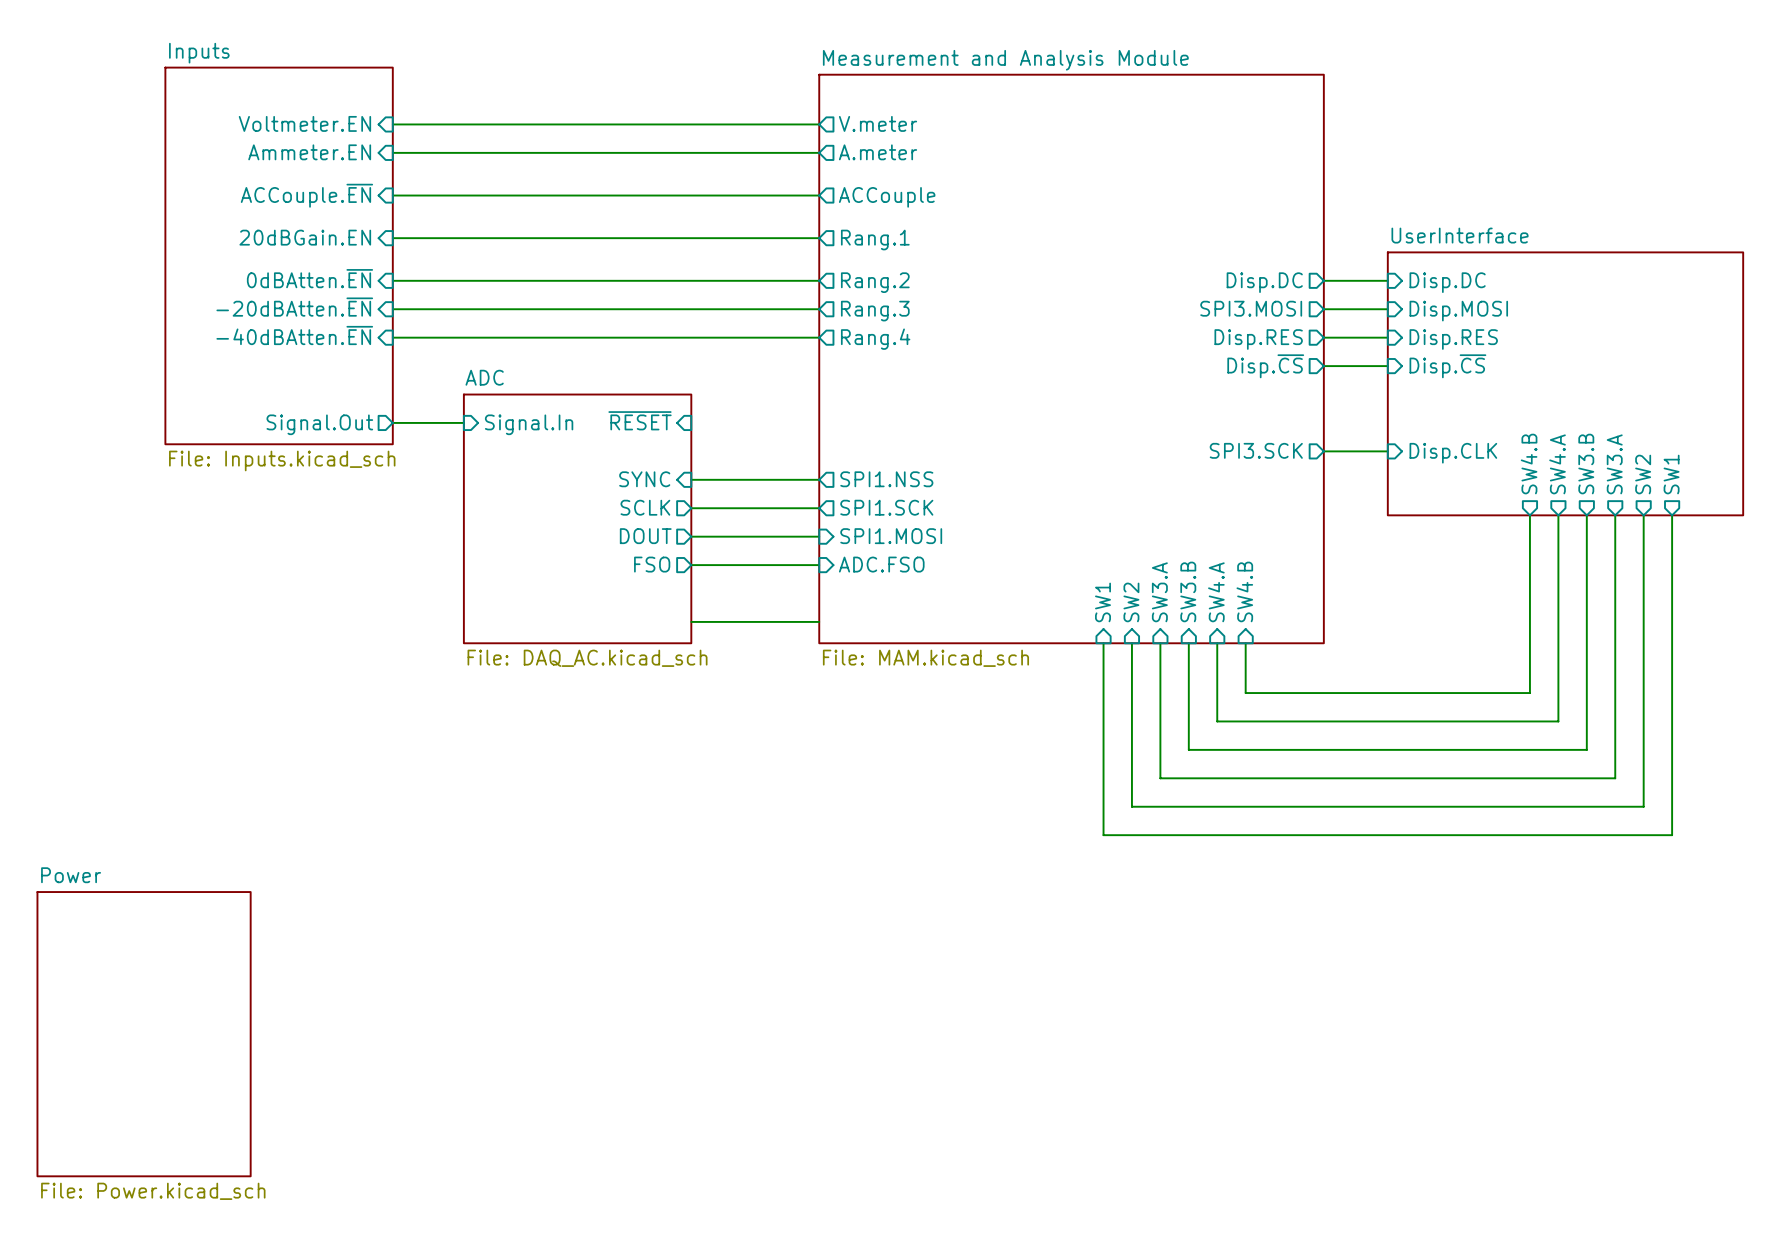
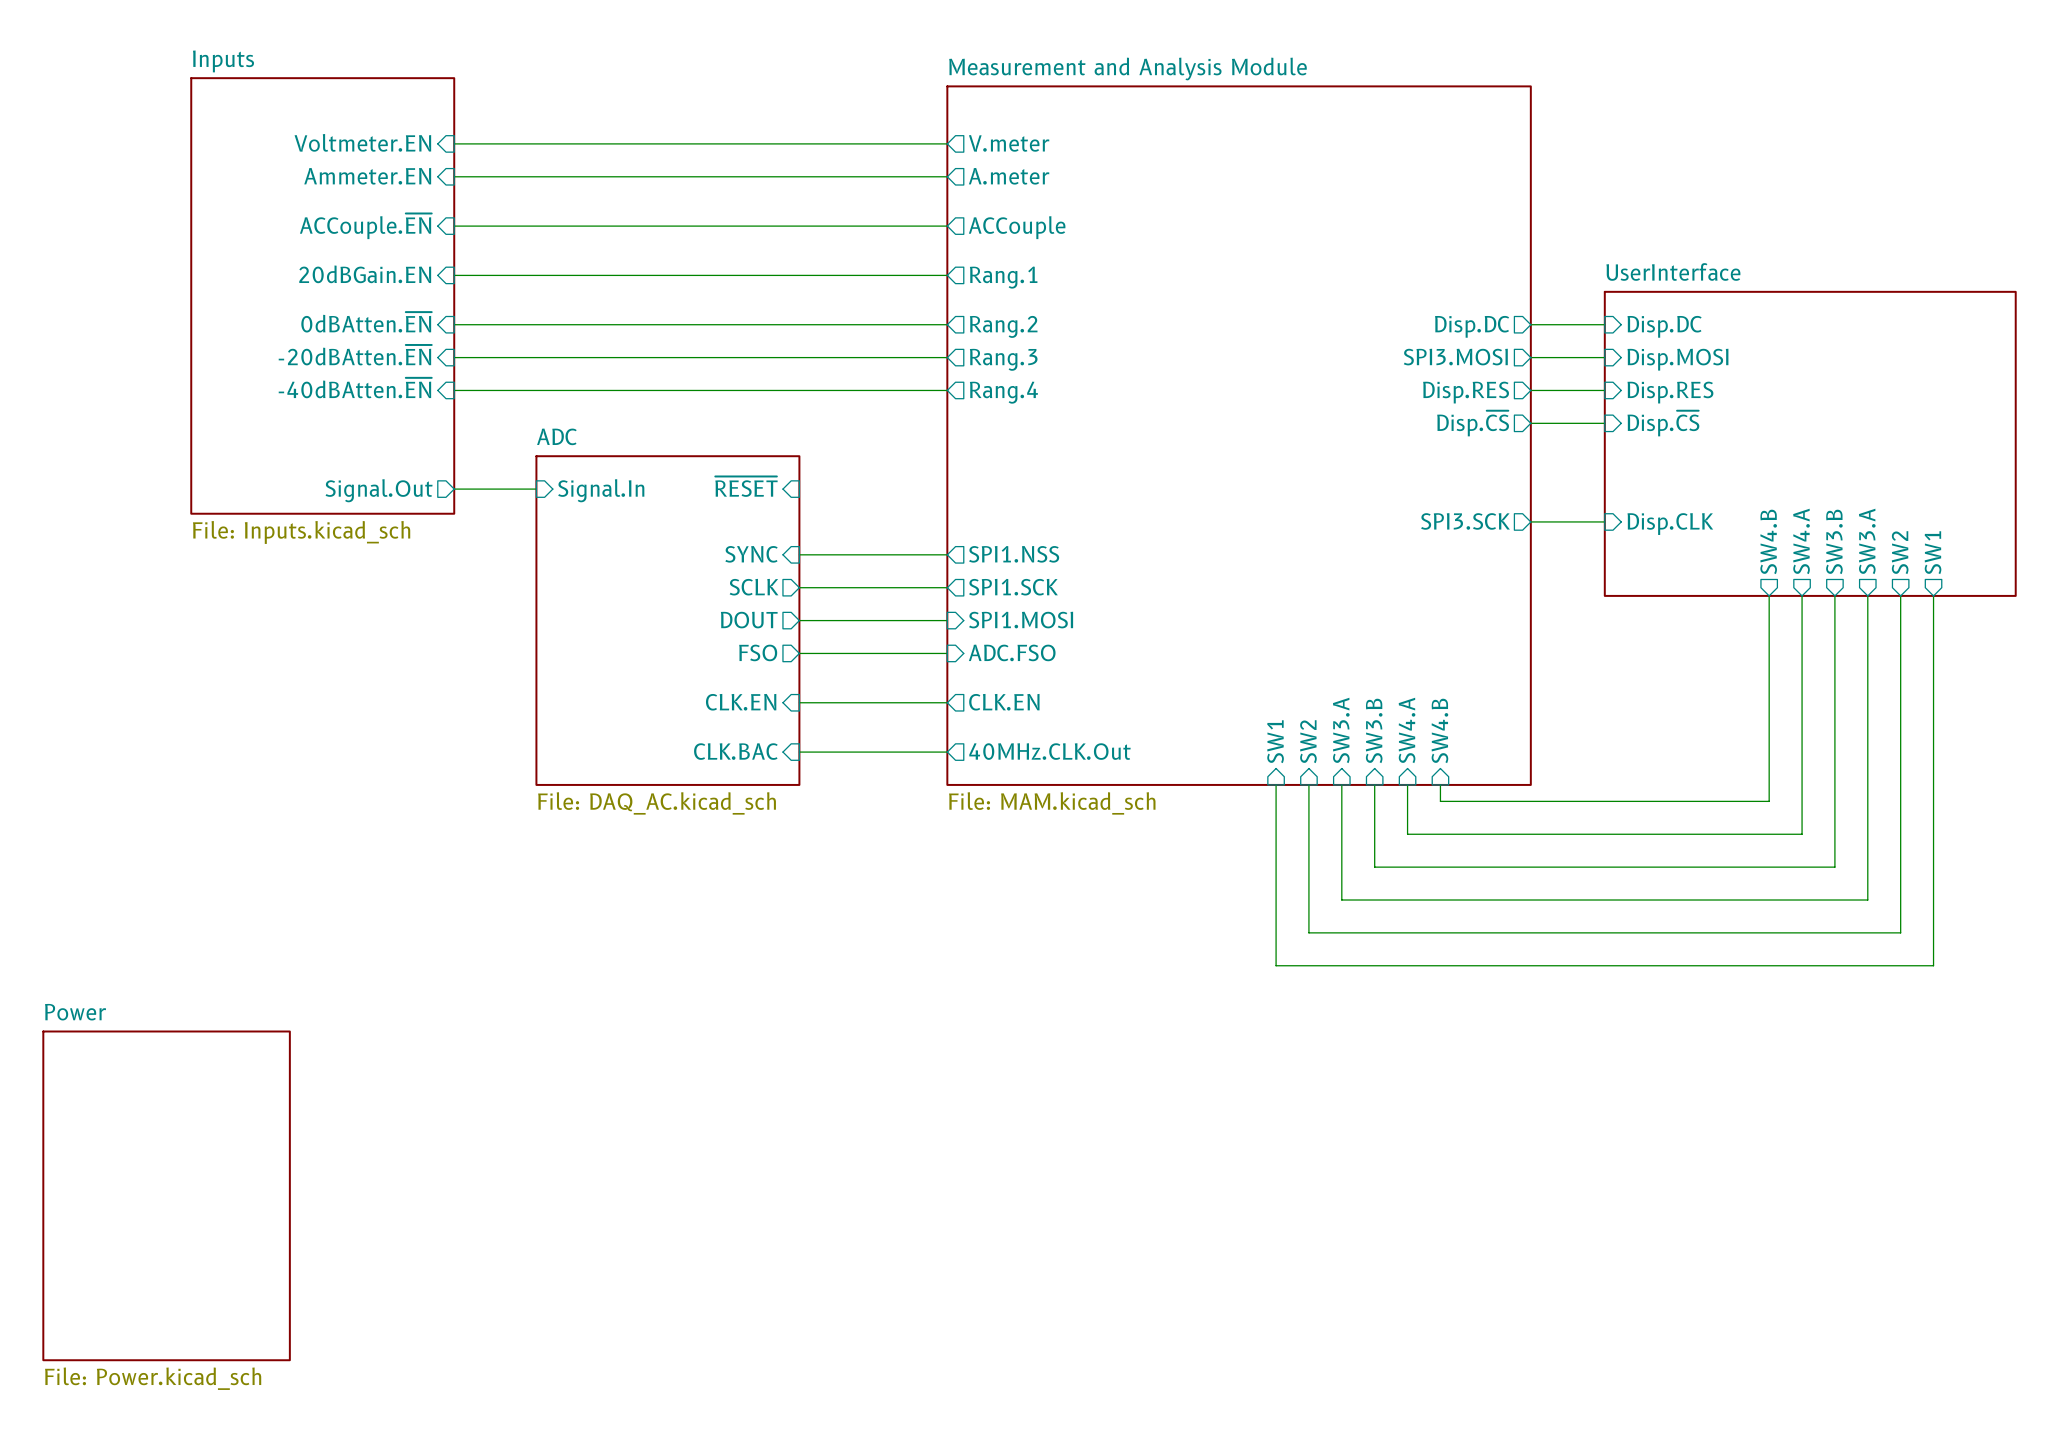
sheet Measurement and Analysis Module: File: MAM.kicad_sch (1071, 358) -> none
sheet Measurement and Analysis Module: none -> File: MAM.kicad_sch (1239, 435)
sheet ADC: File: DAQ_AC.kicad_sch (577, 518) -> none
sheet ADC: none -> File: DAQ_AC.kicad_sch (667, 620)
sheet pin position: SW3.B (1188, 591) -> SW3.B (1374, 730)
sheet pin position: SW4.B (1244, 591) -> SW4.B (1439, 730)
sheet pin position: SW3.A (1159, 592) -> SW3.A (1341, 730)
sheet pin position: SW4.A (1216, 592) -> SW4.A (1407, 730)
sheet pin position: SW1 (1103, 602) -> SW1 (1275, 741)
sheet pin position: SW2 (1131, 602) -> SW2 (1308, 741)
sheet pin: none -> CLK.EN (741, 702)
sheet pin: none -> CLK.EN (1004, 702)
wire: (691, 621) (819, 621) -> (799, 702) (947, 702)
wire: (1103, 643) (1103, 678) -> none
wire: (1131, 643) (1131, 678) -> none
wire: (1160, 643) (1160, 678) -> none
wire: (1188, 643) (1188, 678) -> none
wire: (1217, 643) (1217, 678) -> none
wire: (1245, 643) (1245, 678) -> none
sheet pin: none -> CLK.BAC (735, 751)
sheet pin: none -> 40MHz.CLK.Out (1049, 751)
wire: none -> (799, 752) (947, 752)

